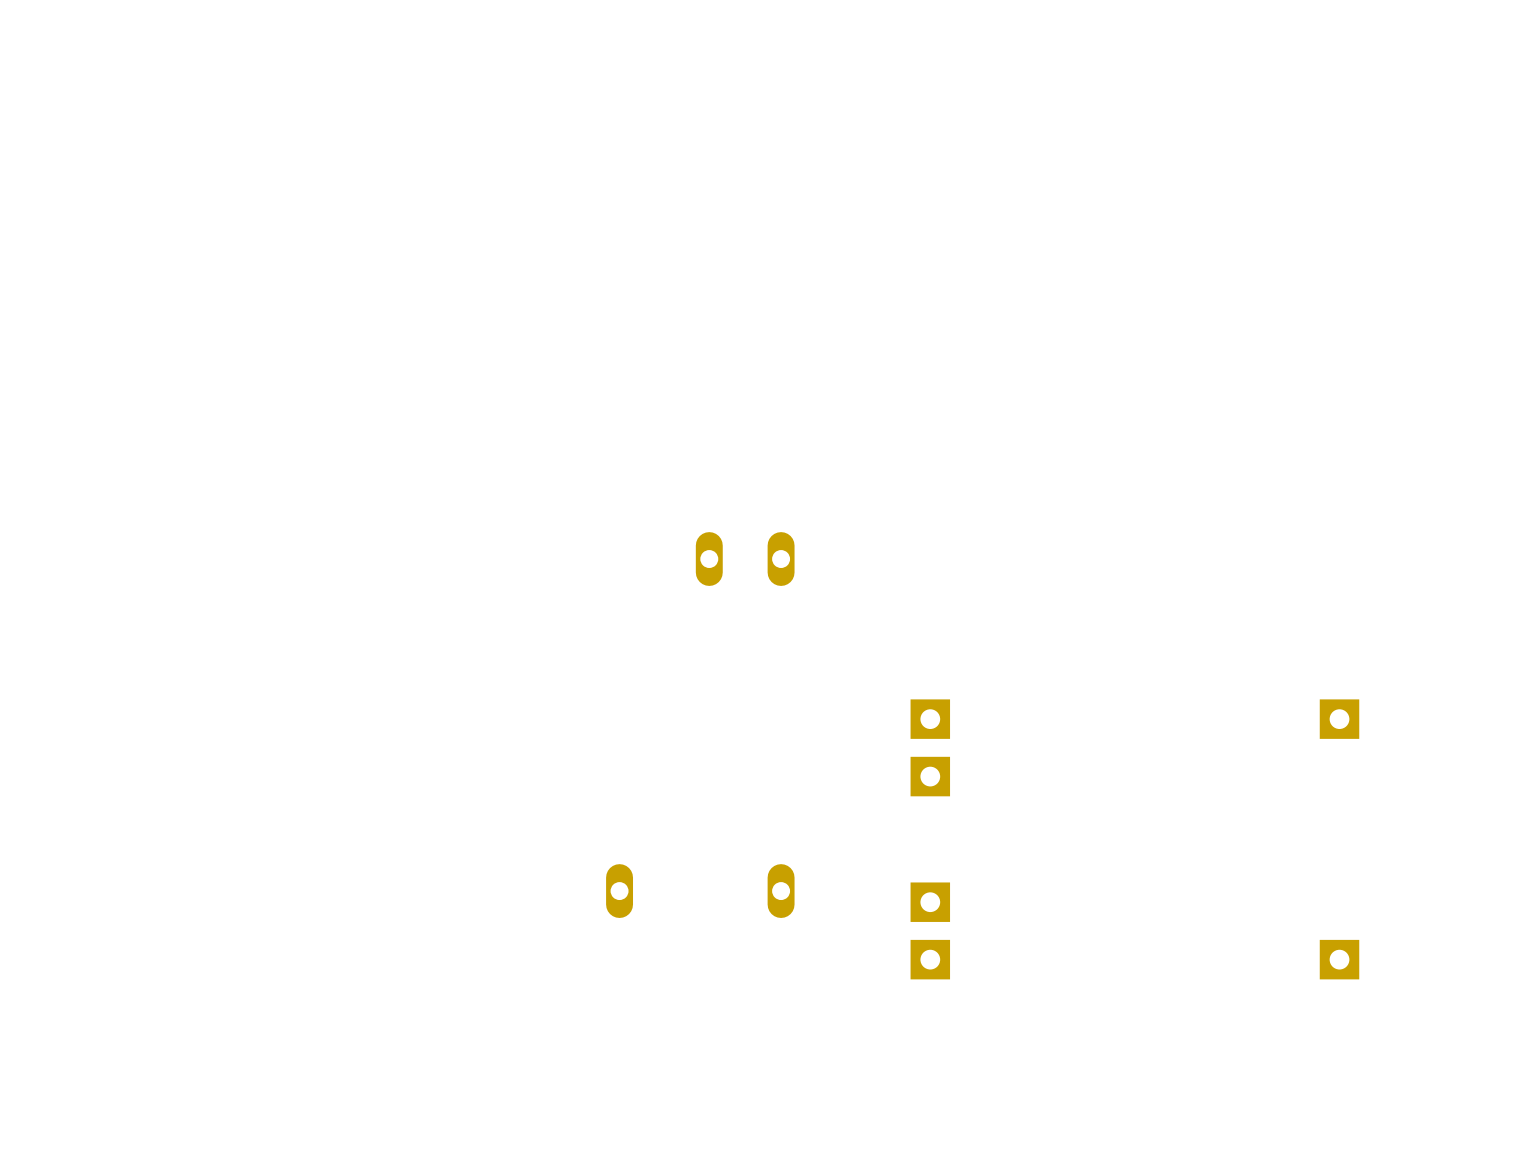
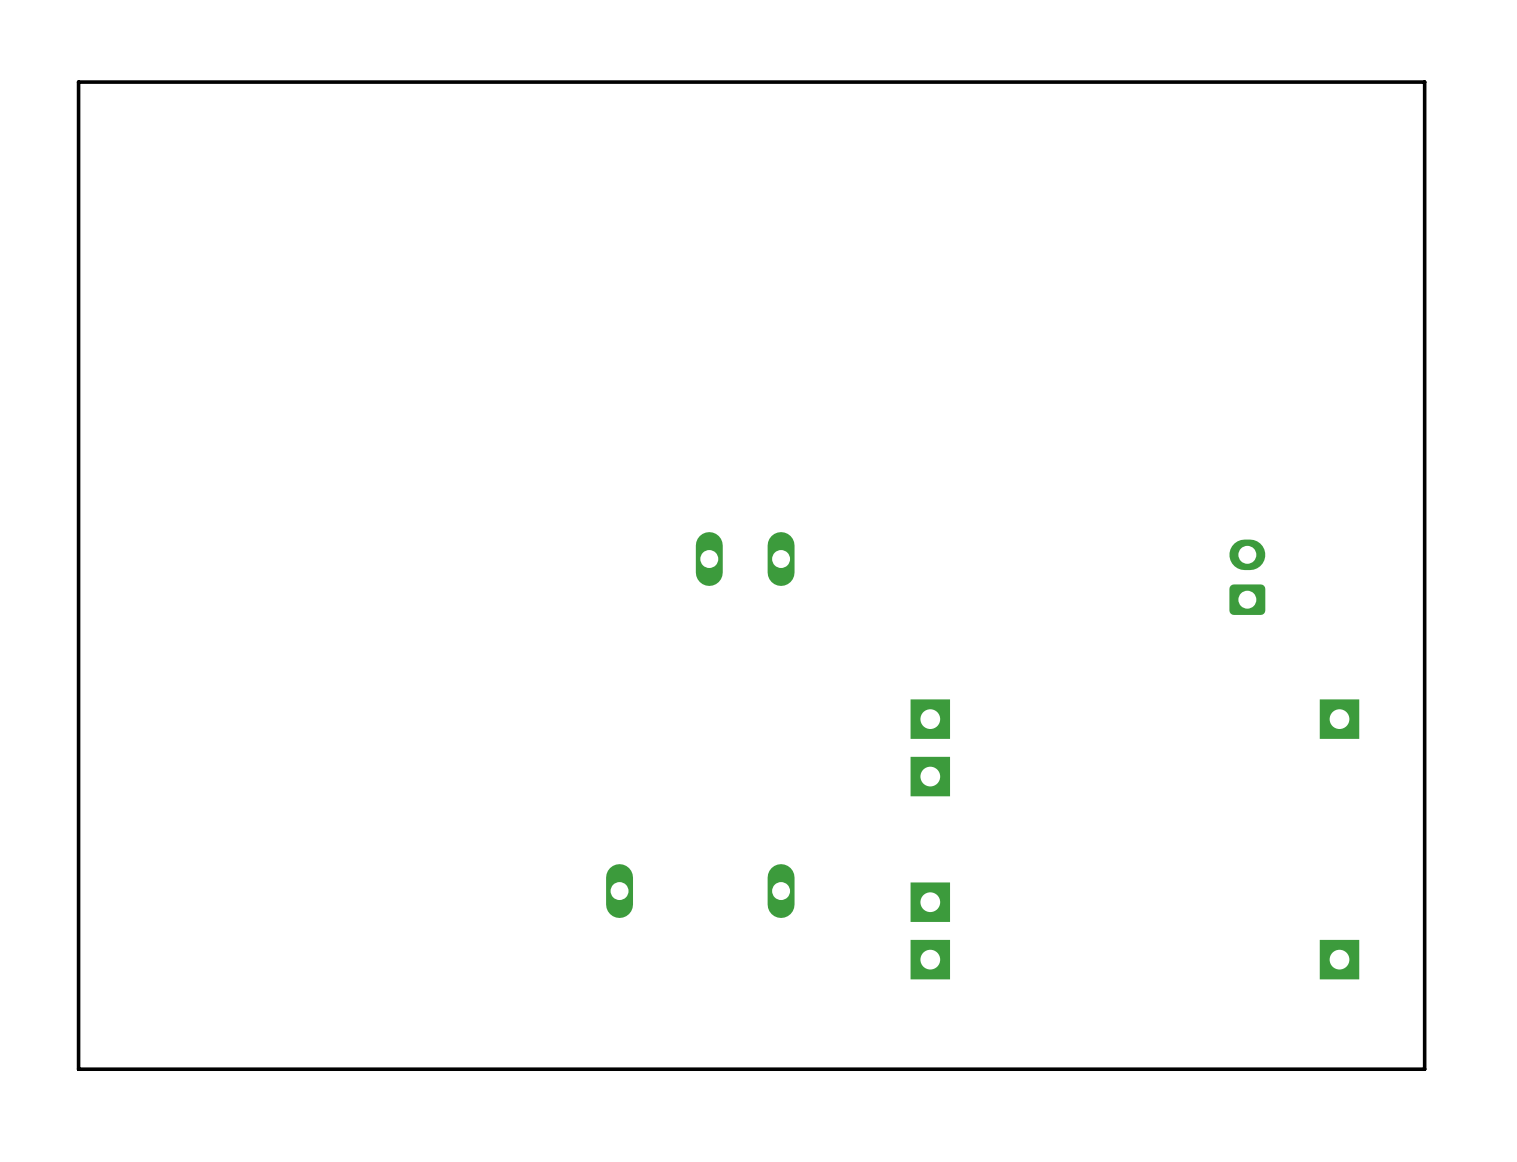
board edge: none -> (1424, 82) (78, 82) (78, 1069) (1424, 1069) (1424, 82)
part: none -> (1247, 577)

